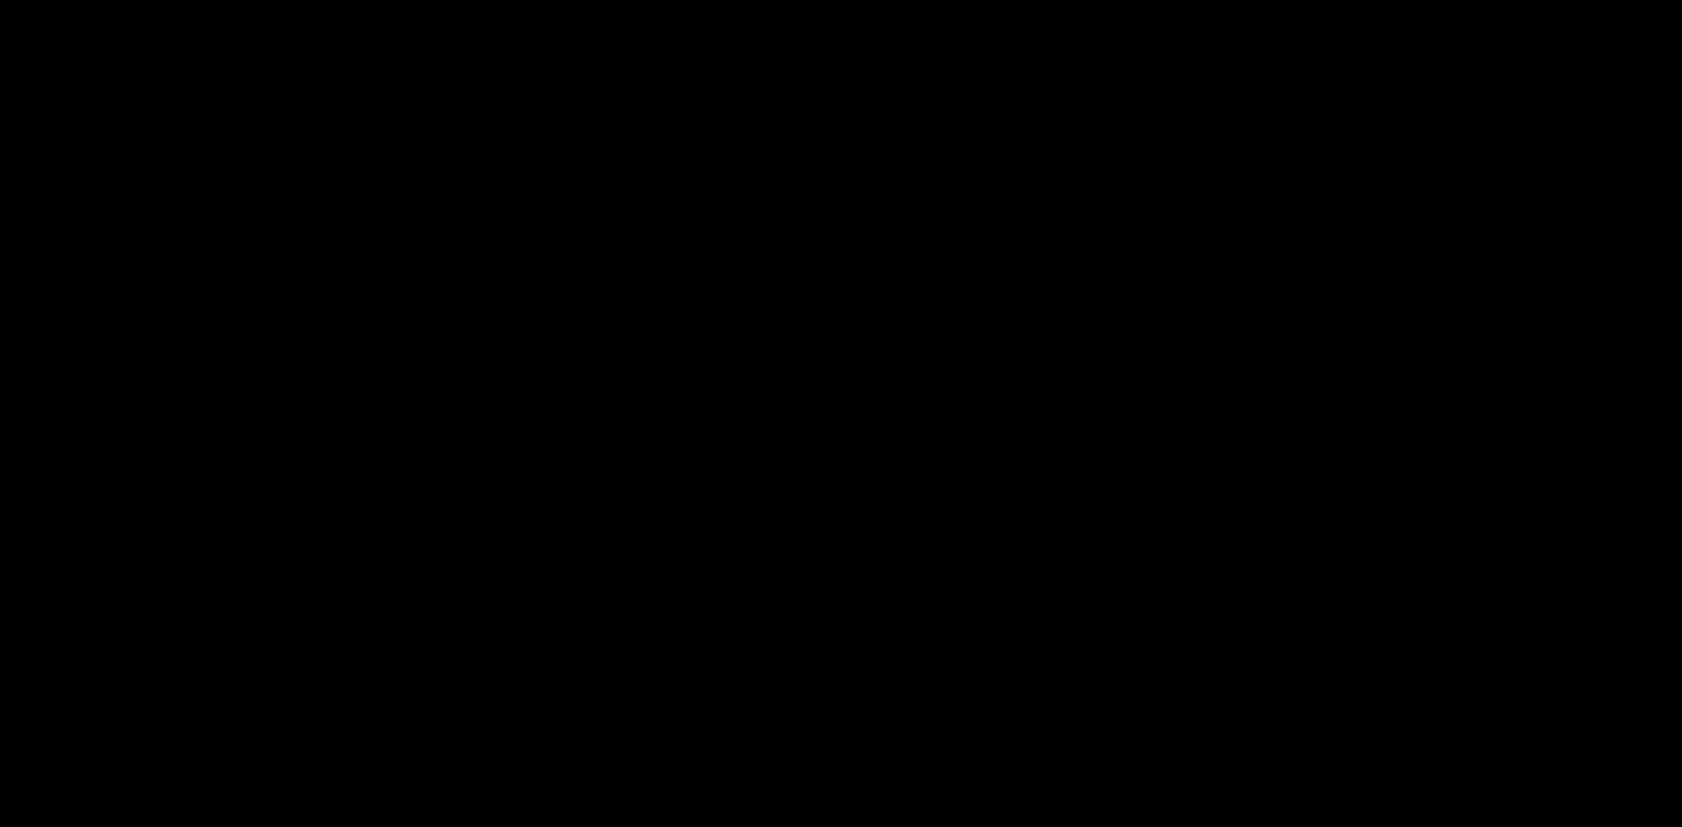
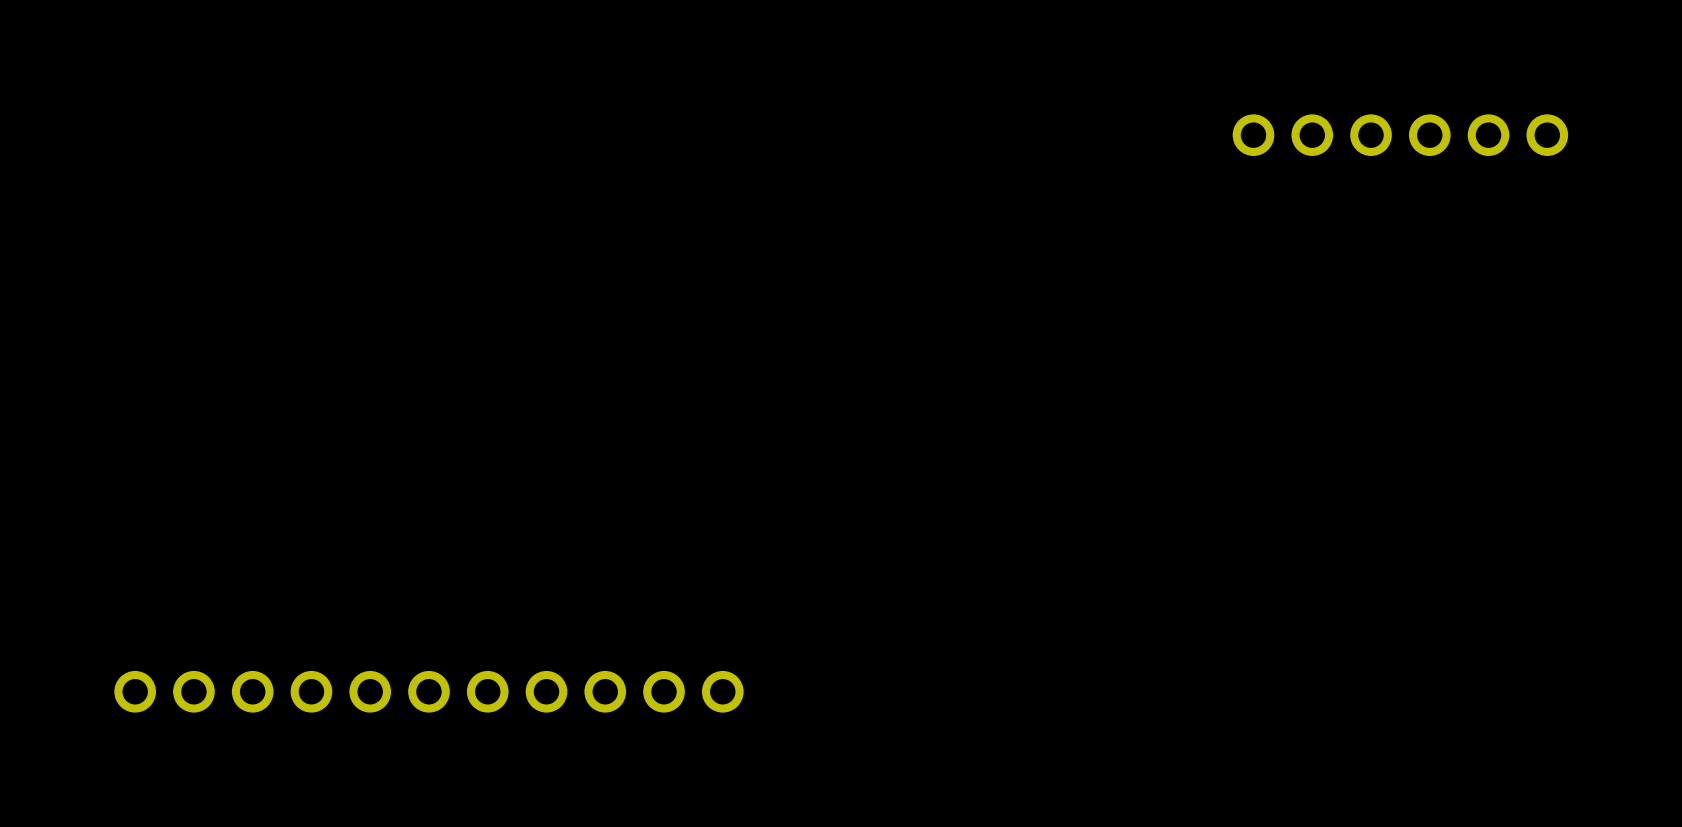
part: none -> (1400, 135)
part: none -> (428, 691)

